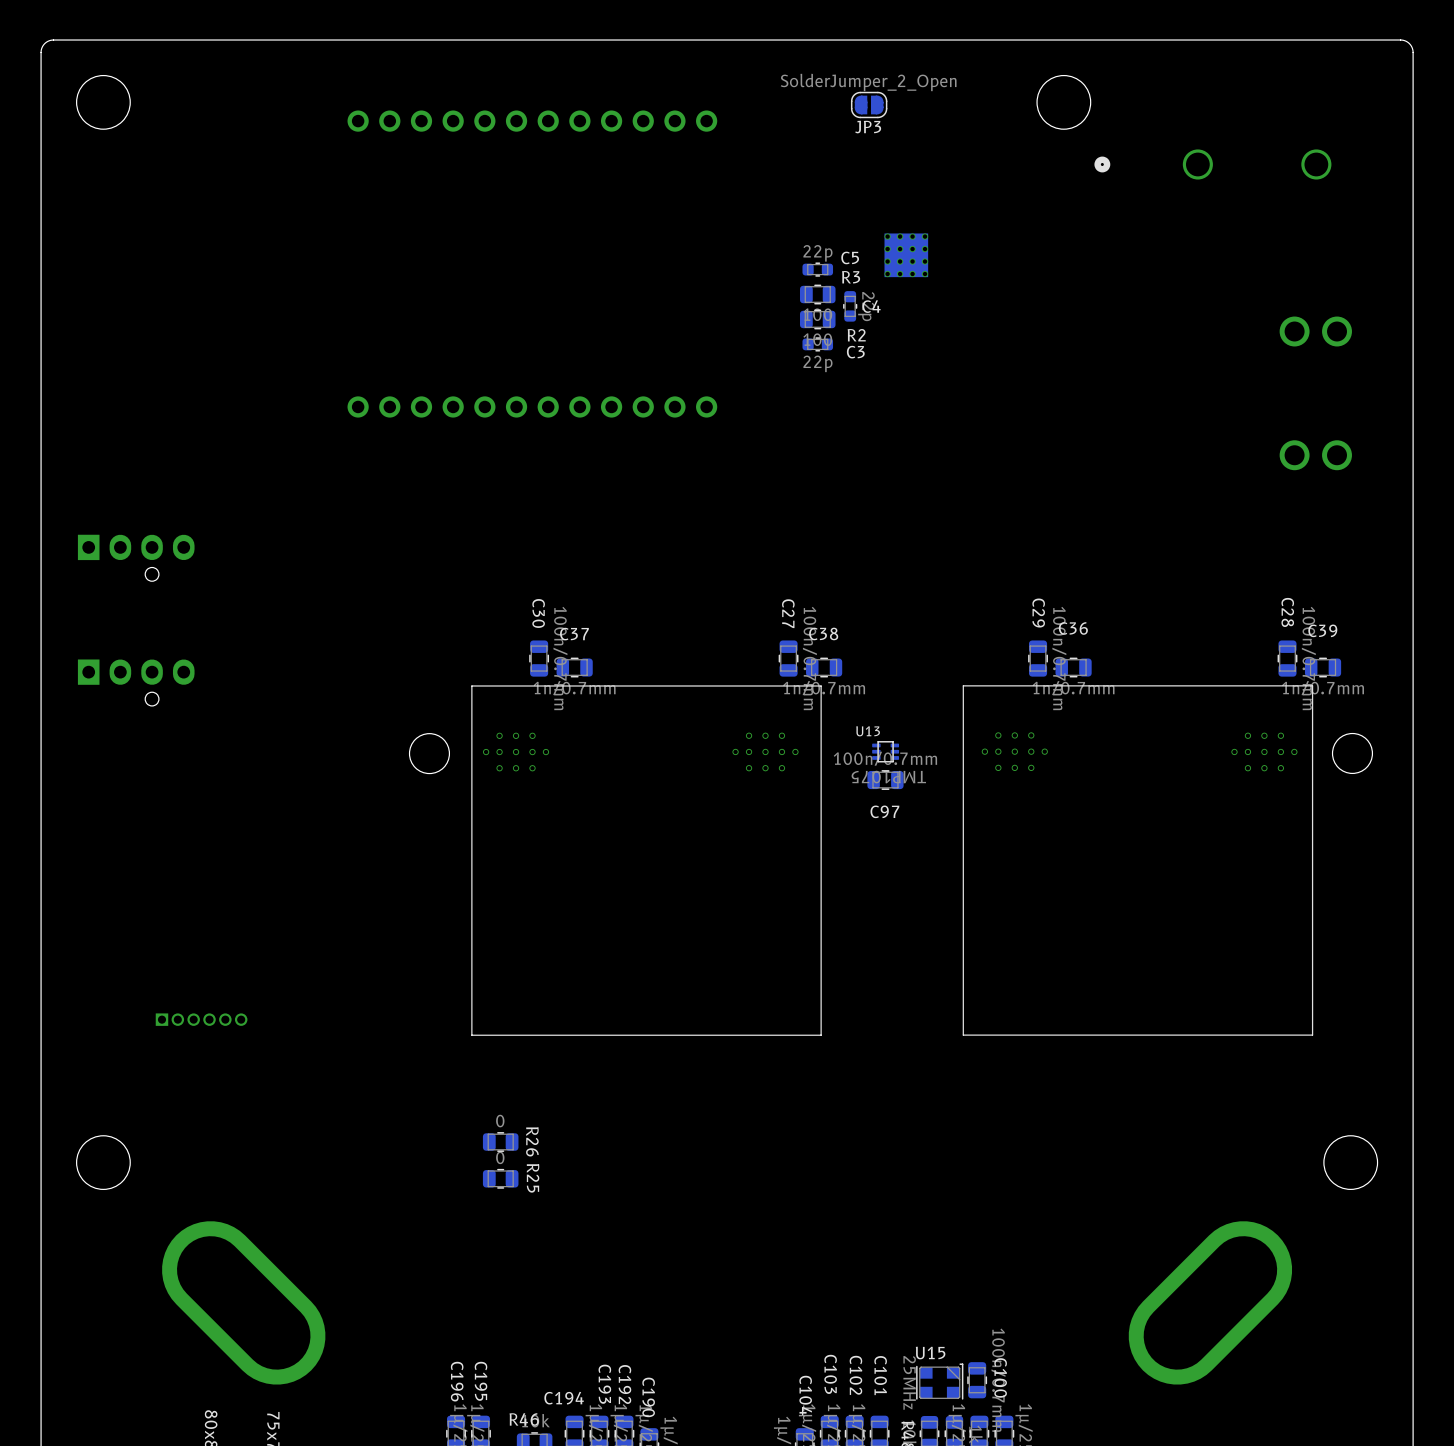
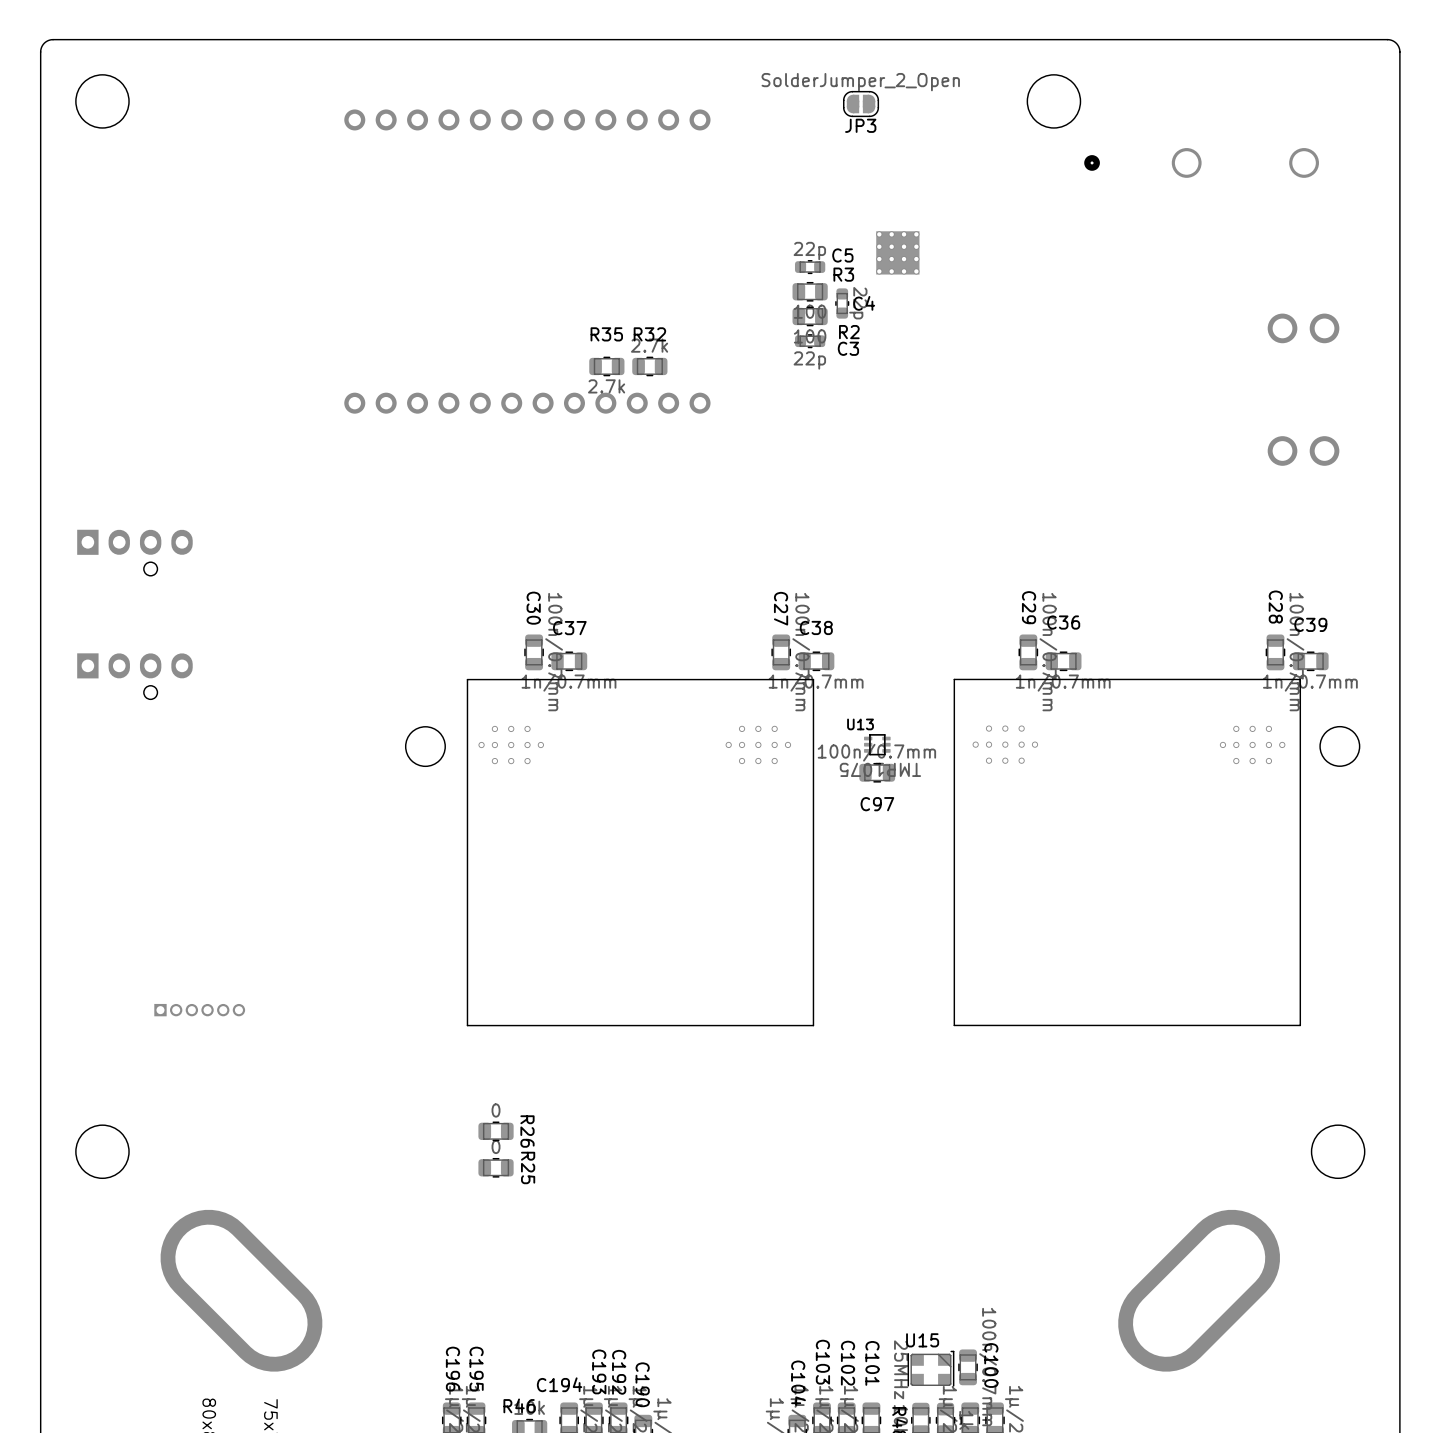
R35: none -> 2.7k (606, 366)
R32: none -> 2.7k (649, 366)

